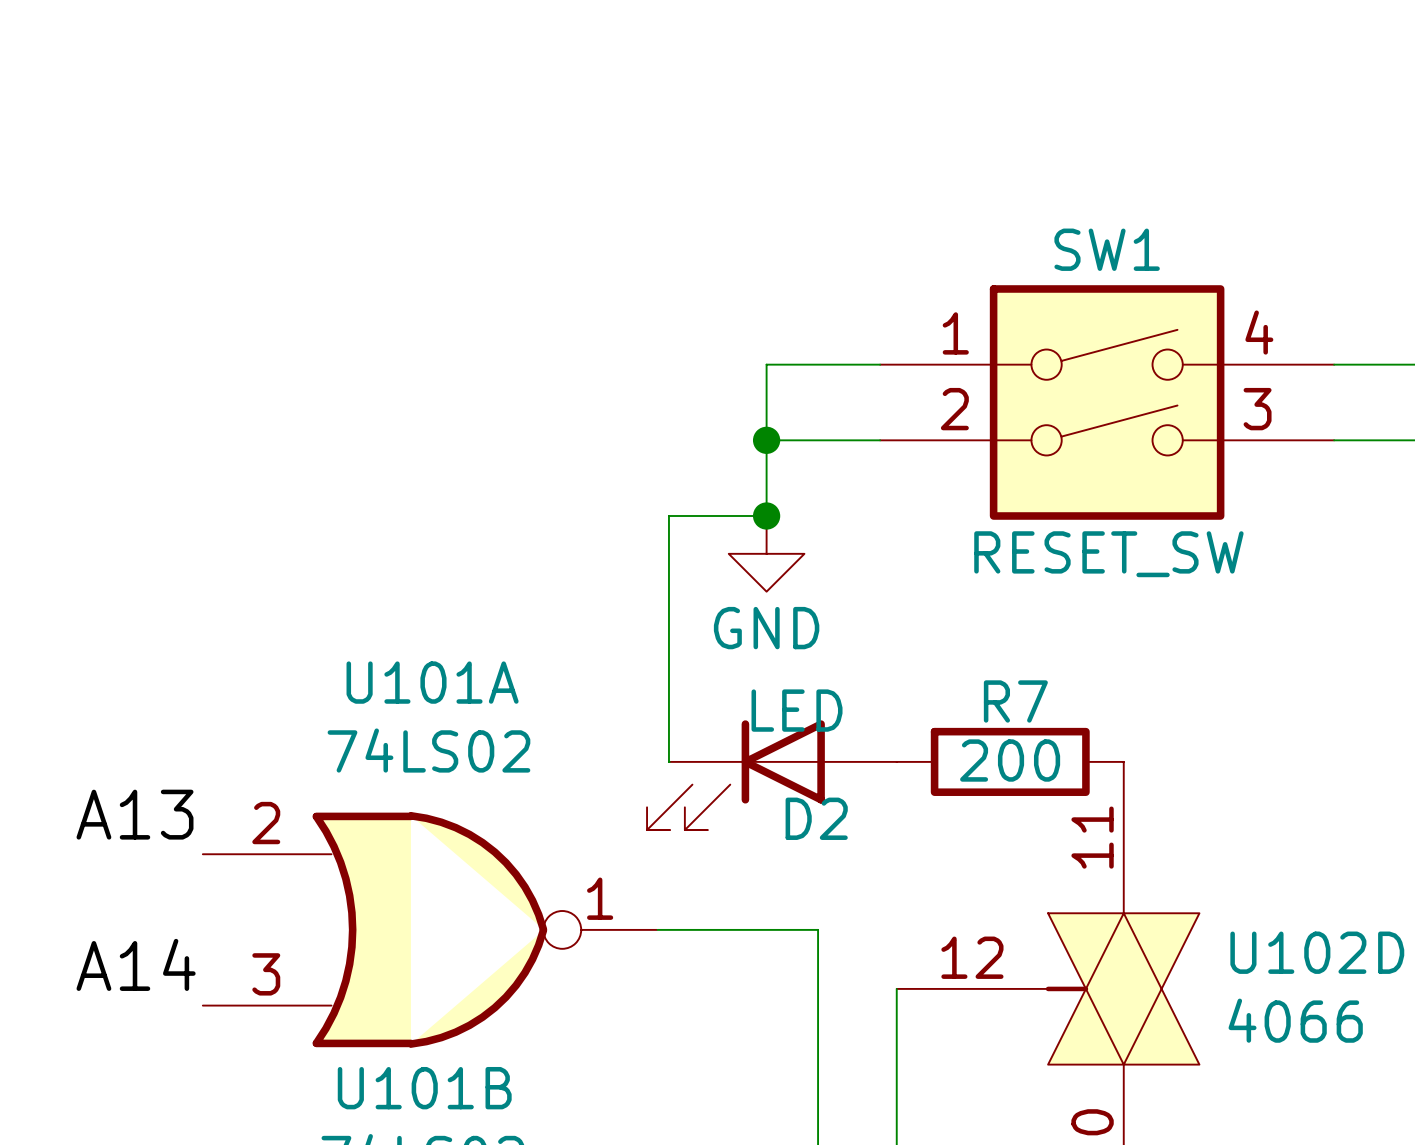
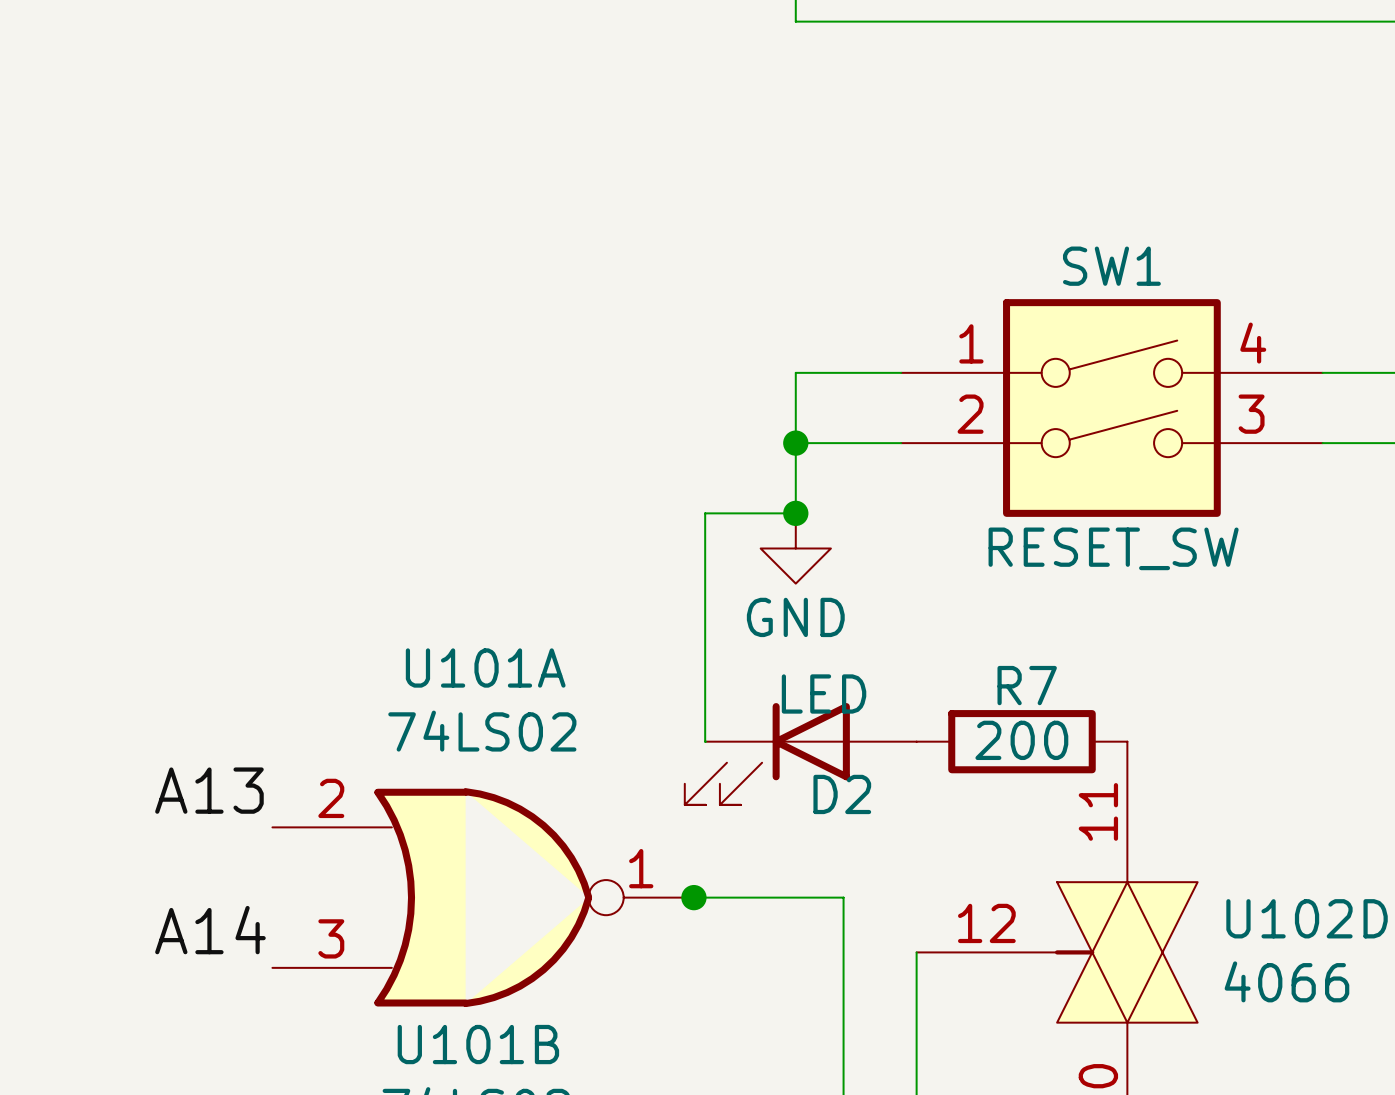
junction: none -> (693, 897)

